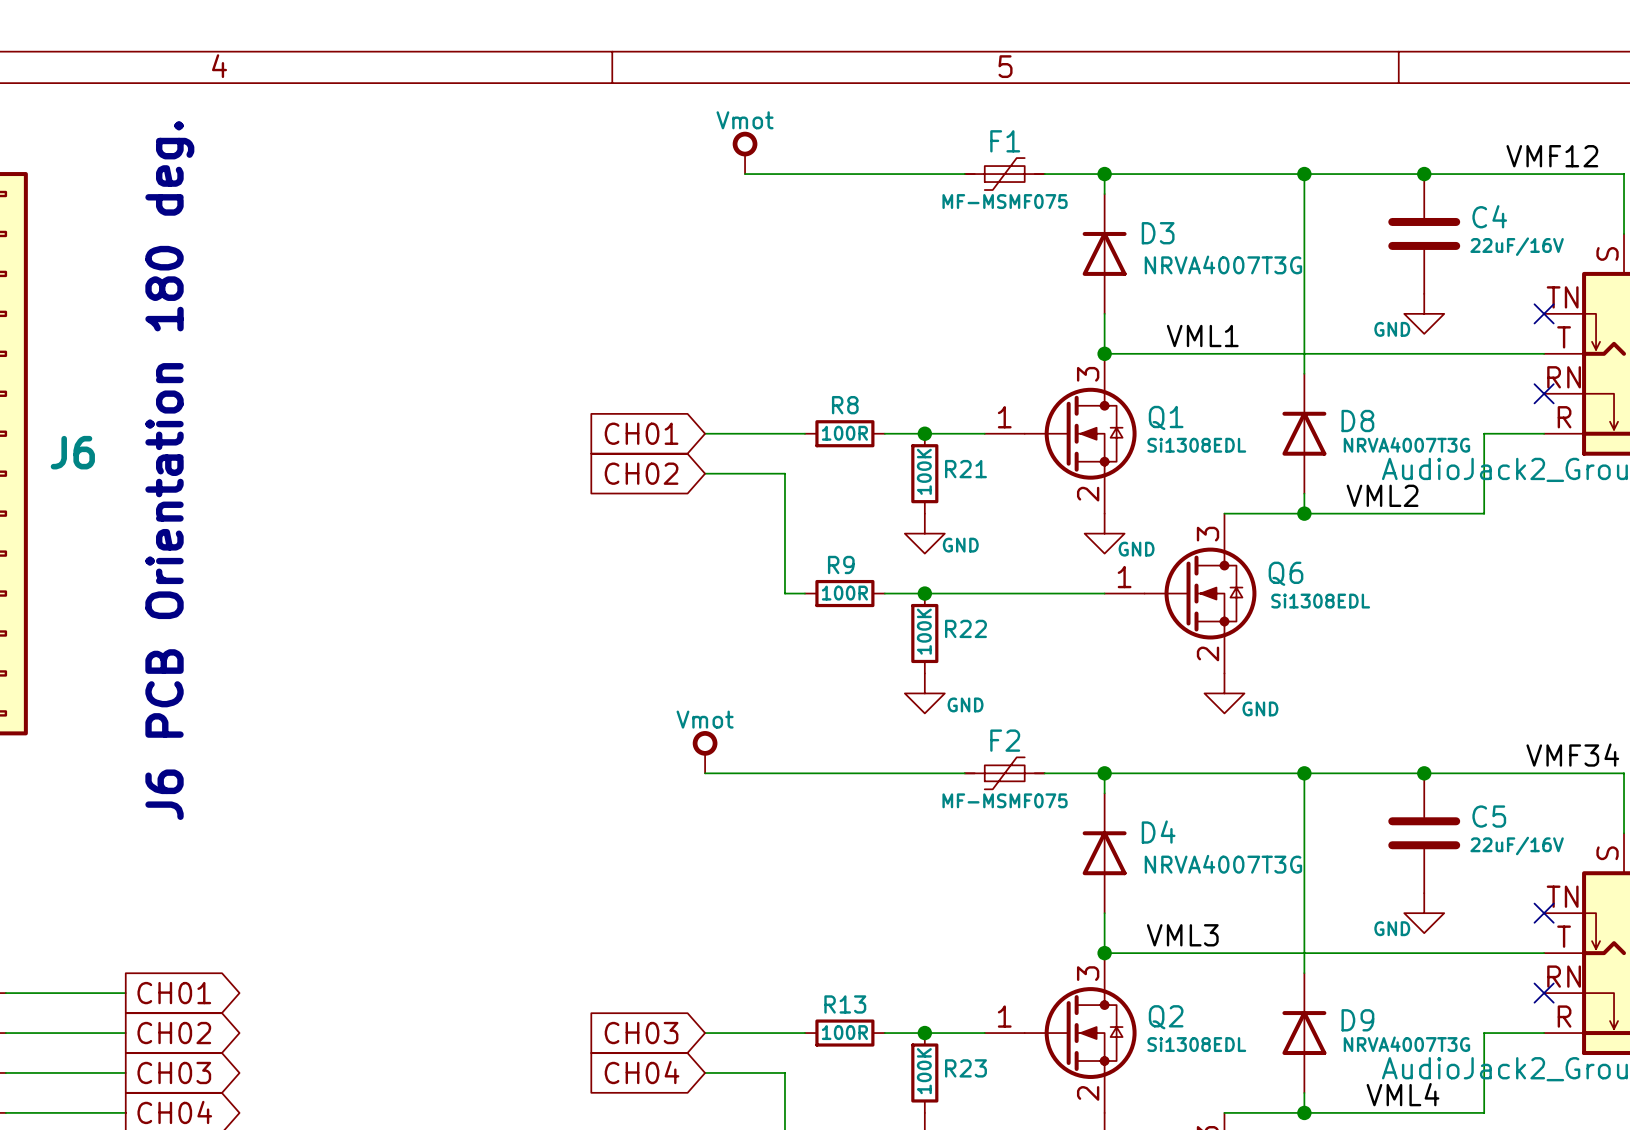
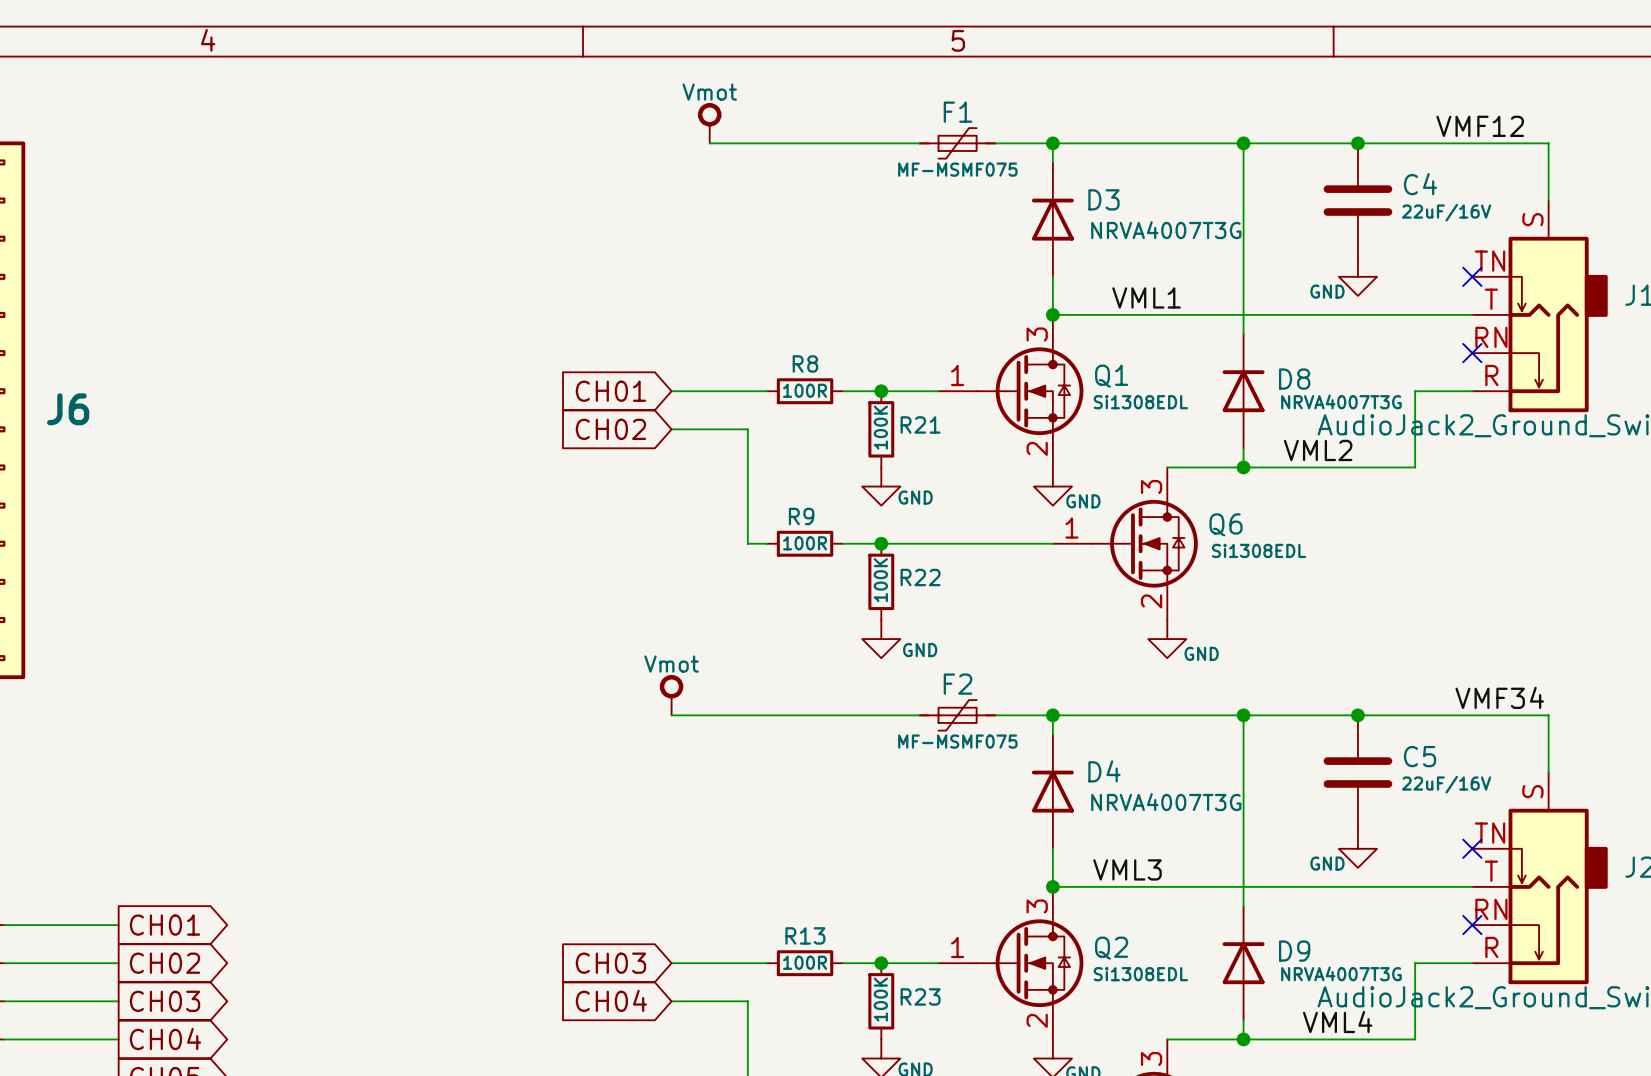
text: J6 PCB Orientation 180 deg. (169, 470) -> none

